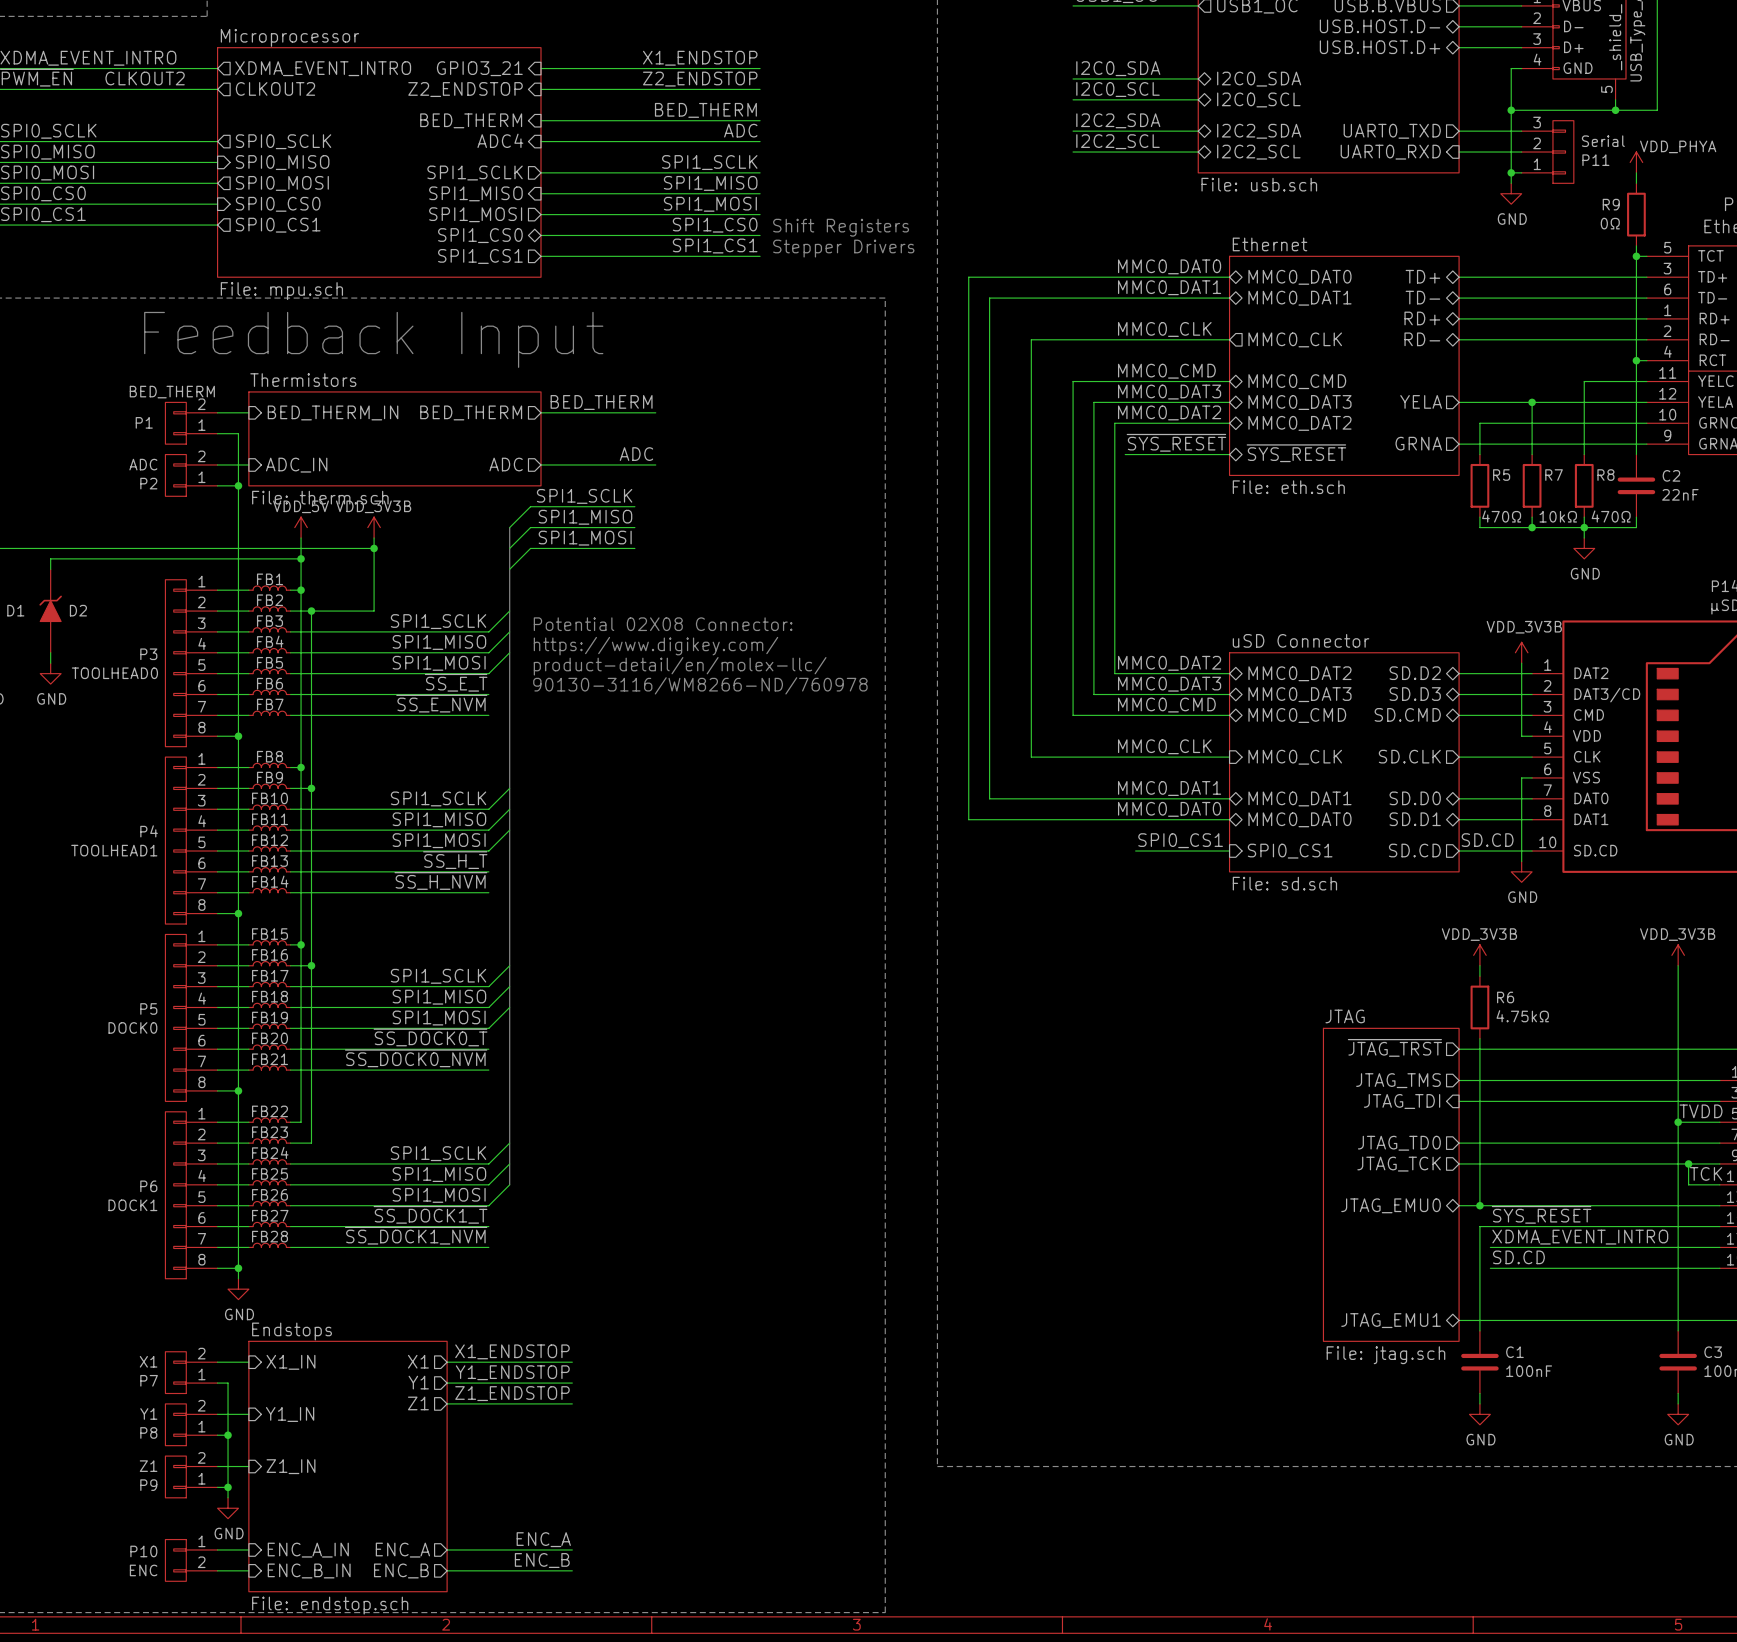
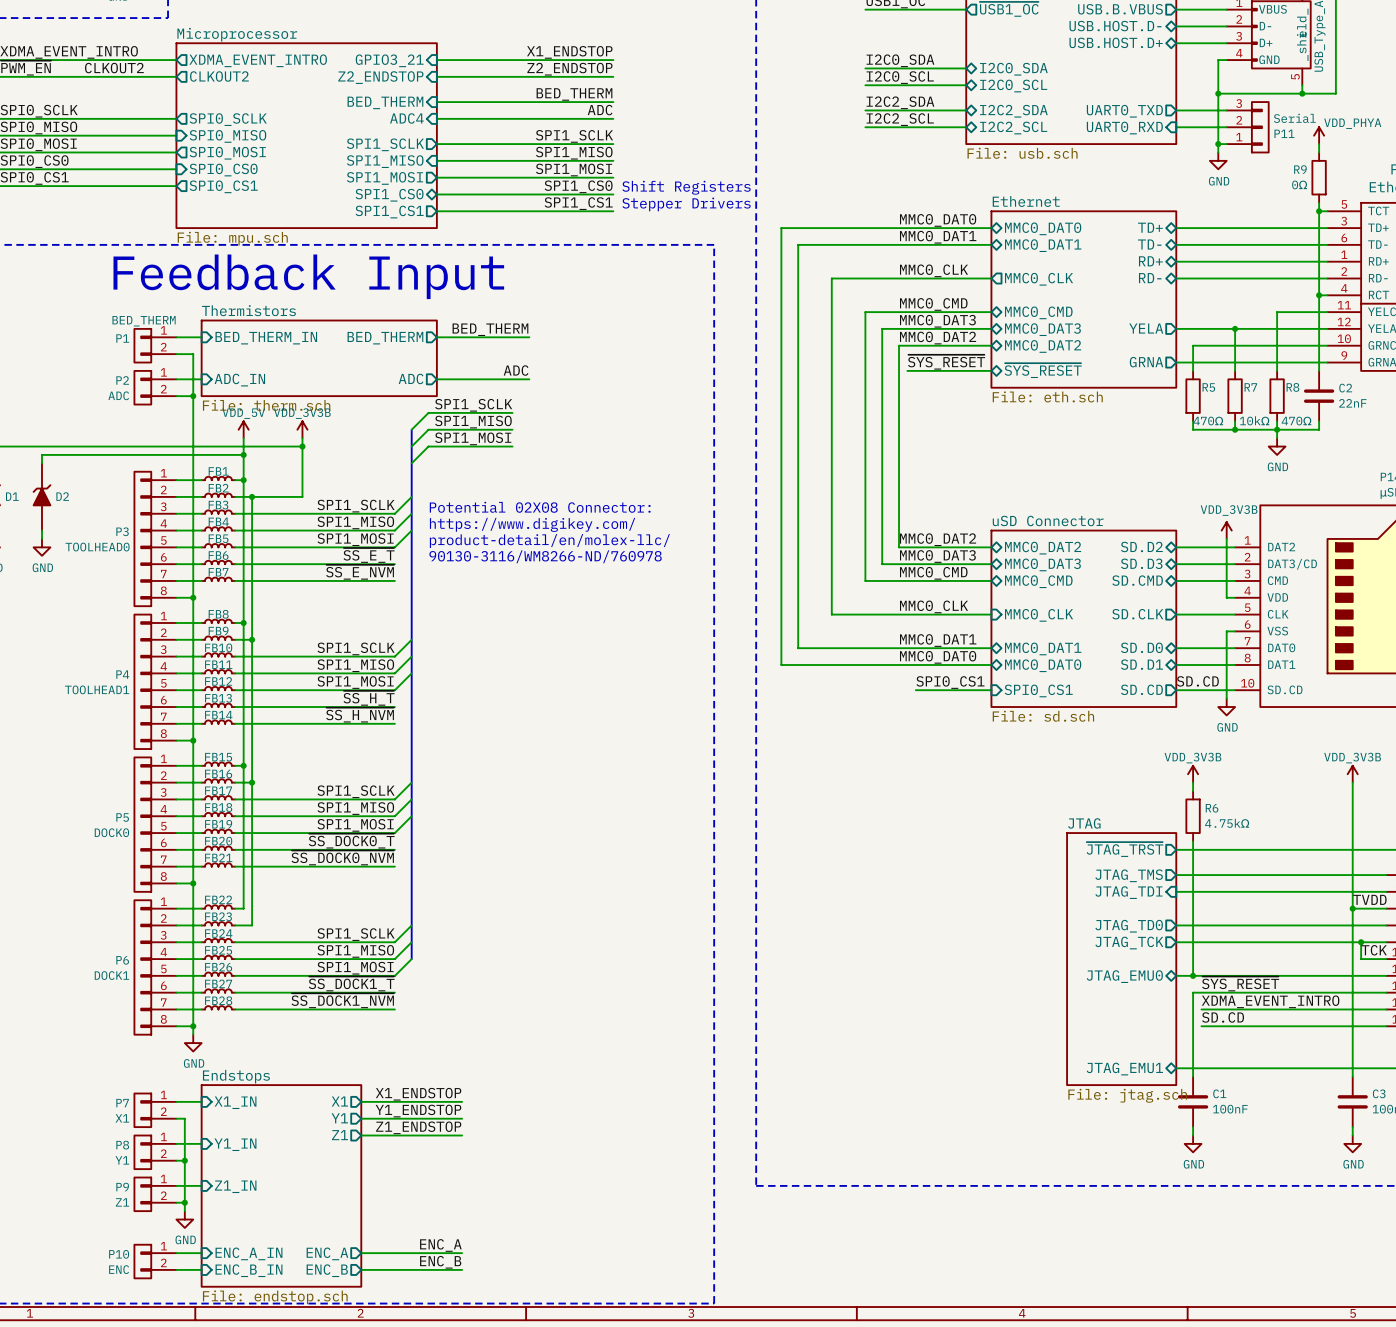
P1 flip: as is (175, 423) -> up-down (142, 345)
P2 flip: as is (175, 475) -> up-down (142, 387)
P7 flip: as is (175, 1372) -> up-down (142, 1110)
P8 flip: as is (175, 1424) -> up-down (142, 1152)
P9 flip: as is (175, 1476) -> up-down (142, 1194)

